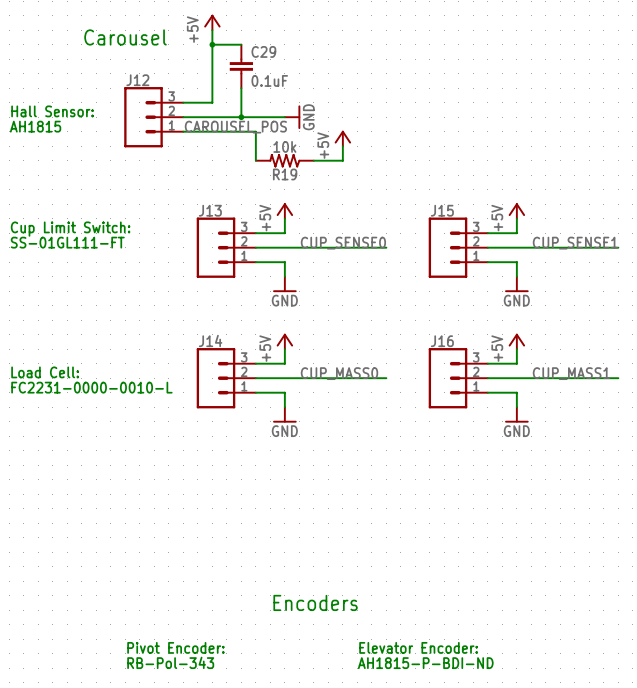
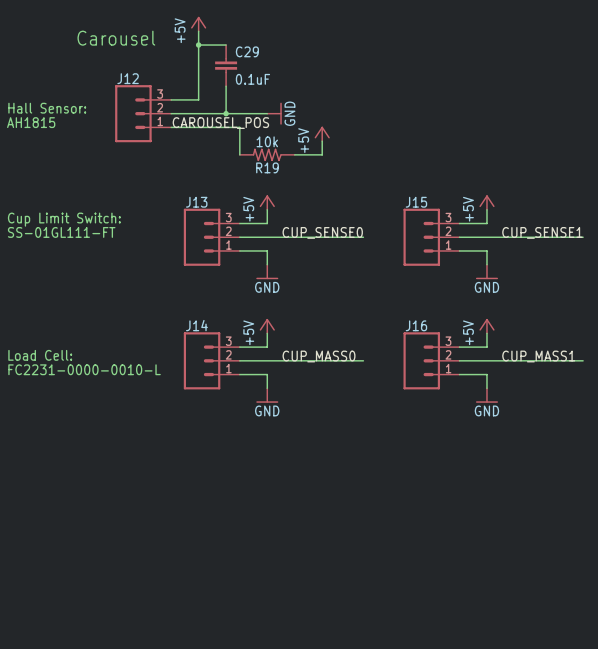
text: Encoders (315, 602) -> none
text: Pivot Encoder: (175, 647) -> none
text: Elevator Encoder: (418, 647) -> none
text: RB-Pol-343 (170, 662) -> none
text: AH1815-P-BDI-ND (425, 663) -> none

